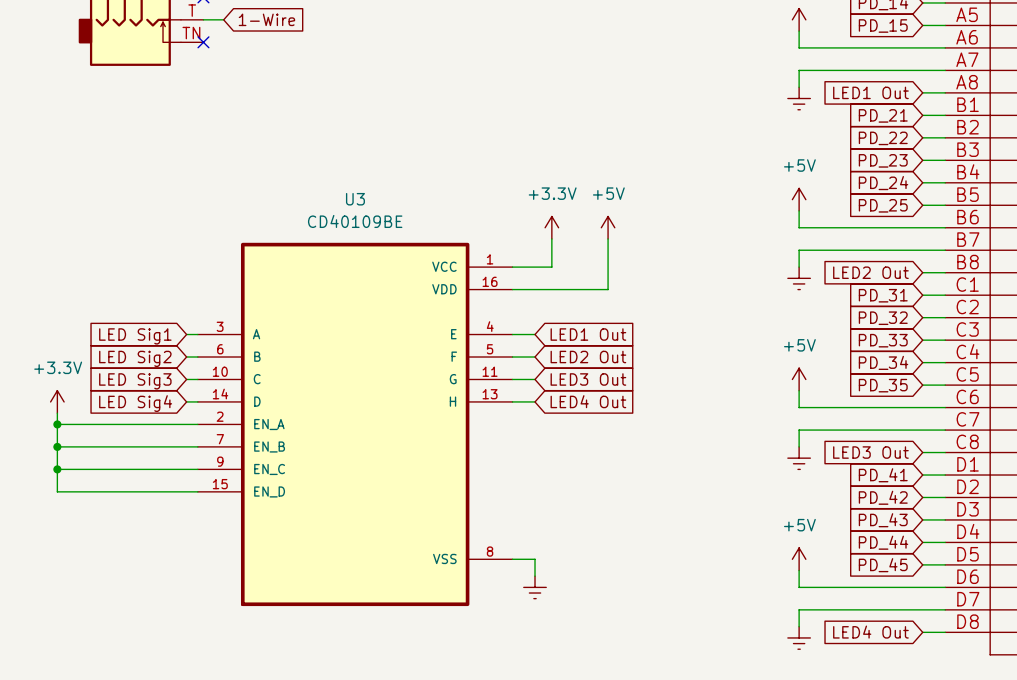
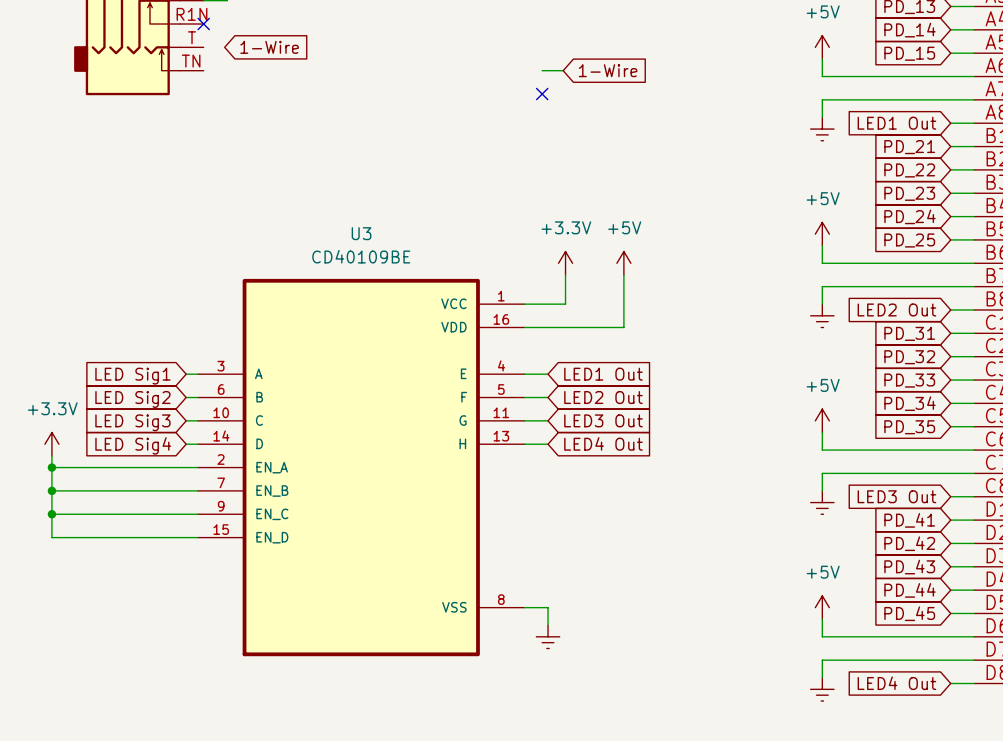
wire: (203, 19) (223, 19) -> none
no-connect mark: (203, 42) -> none
wire: none -> (542, 70) (563, 70)
global label: none -> 1-Wire (608, 70)
no-connect mark: none -> (542, 94)

